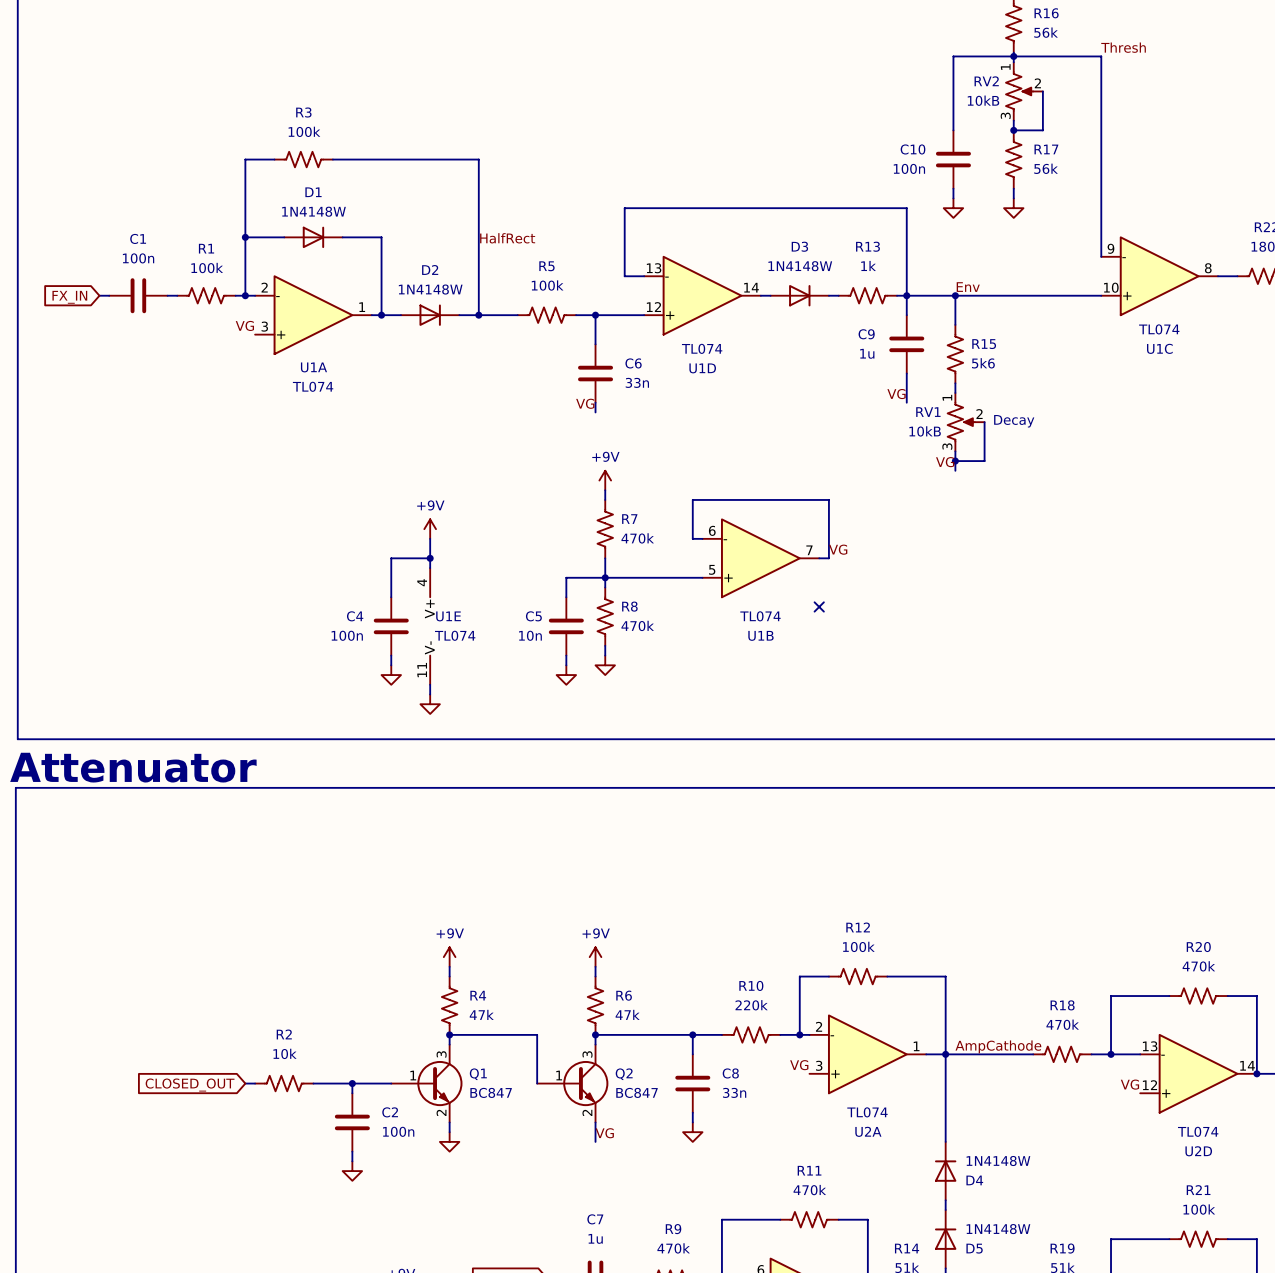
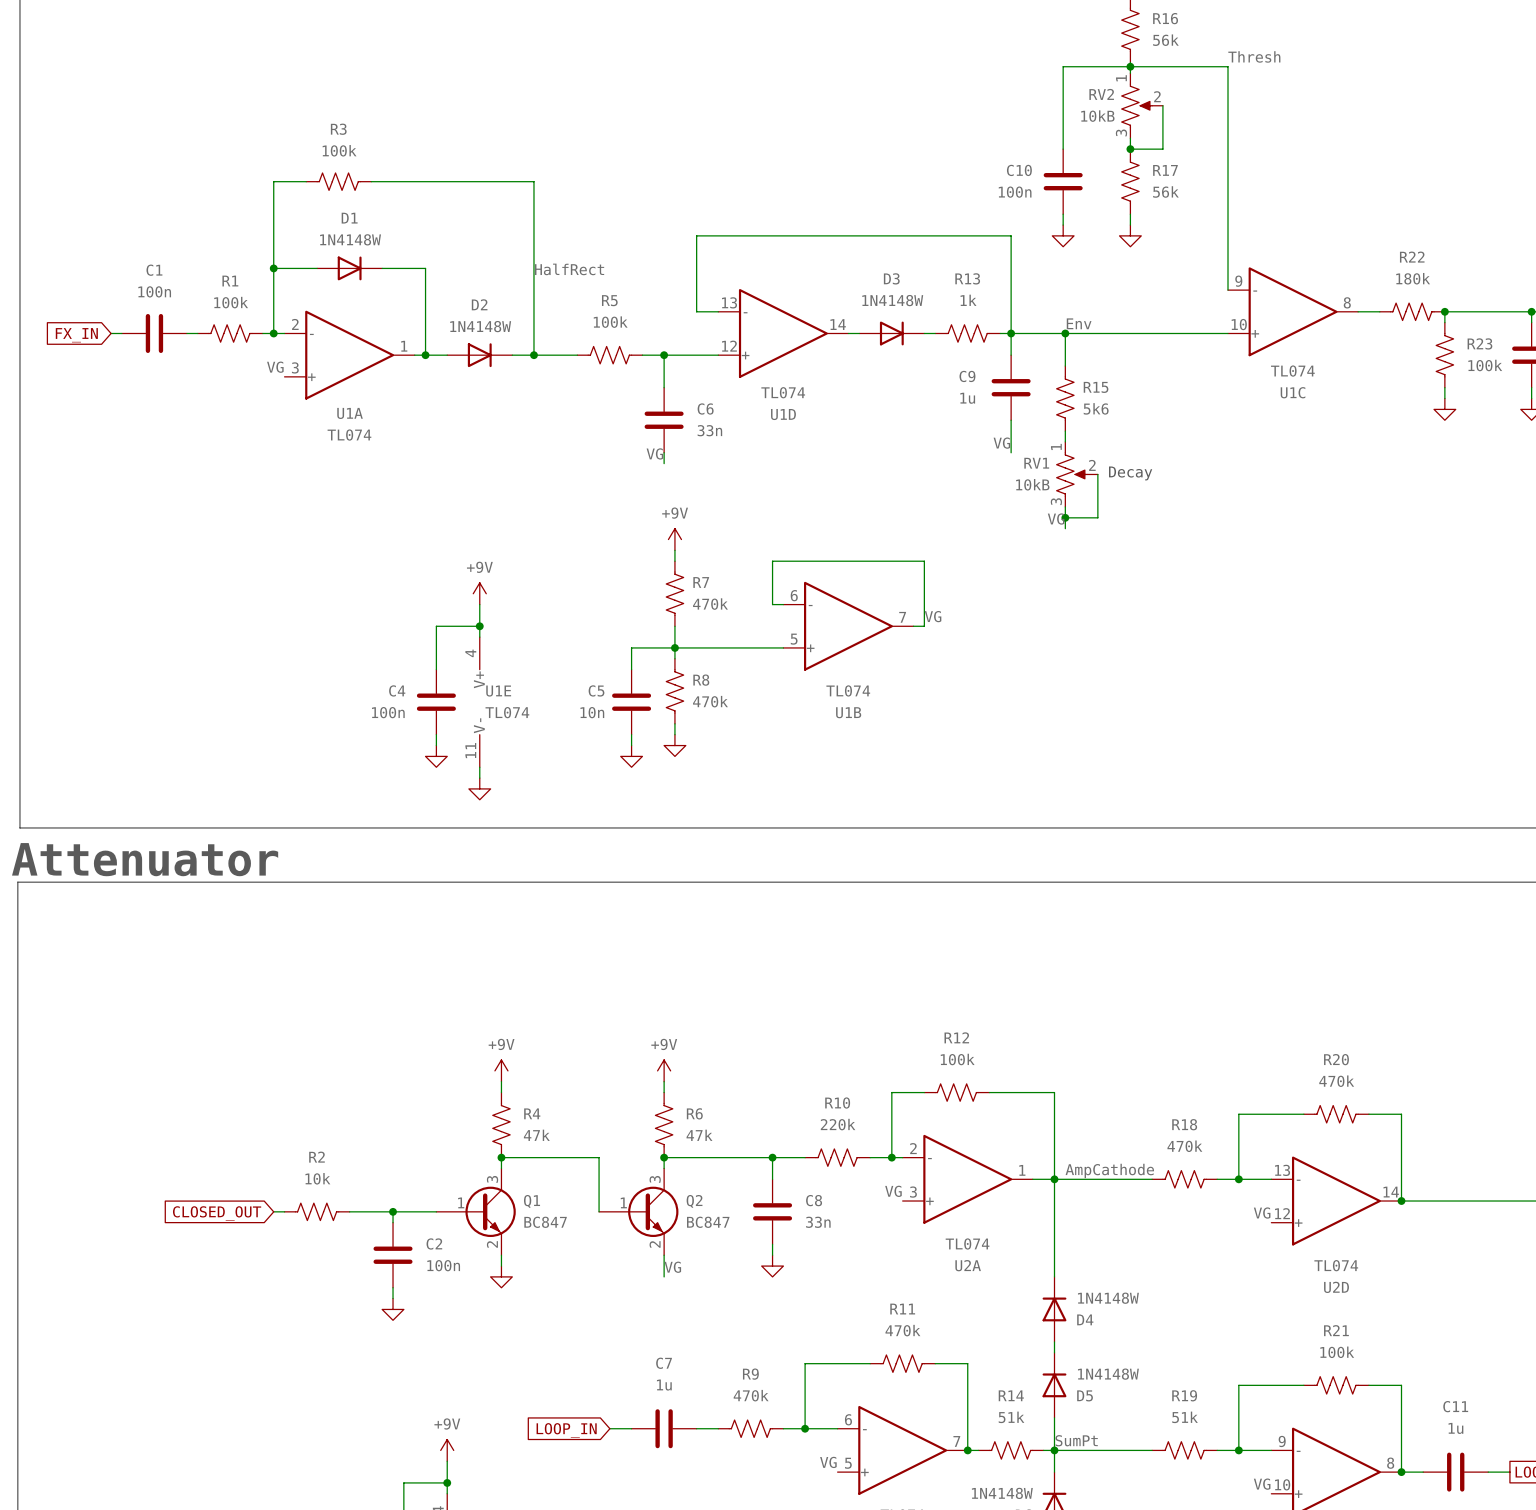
no-connect mark: (819, 606) -> none

